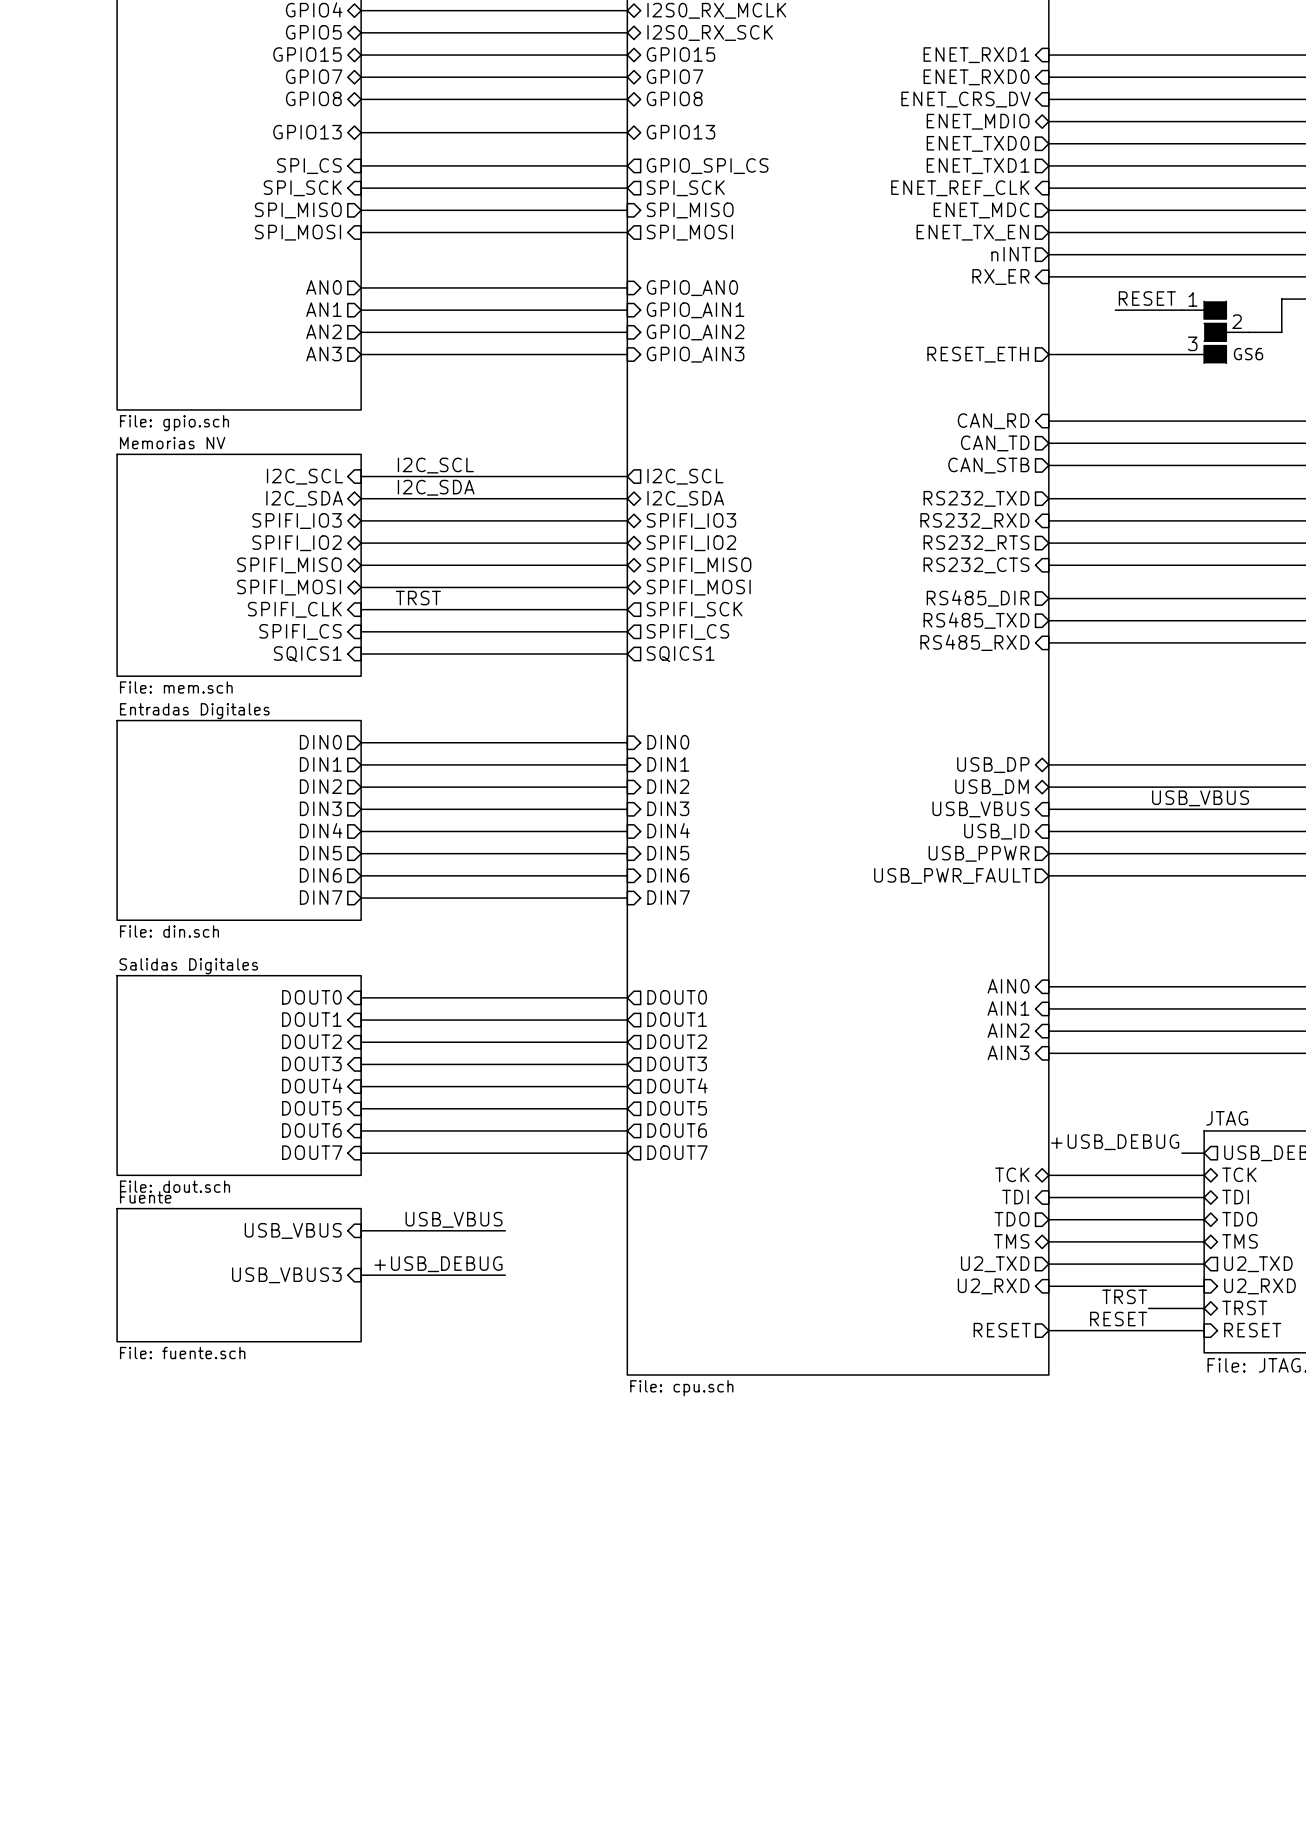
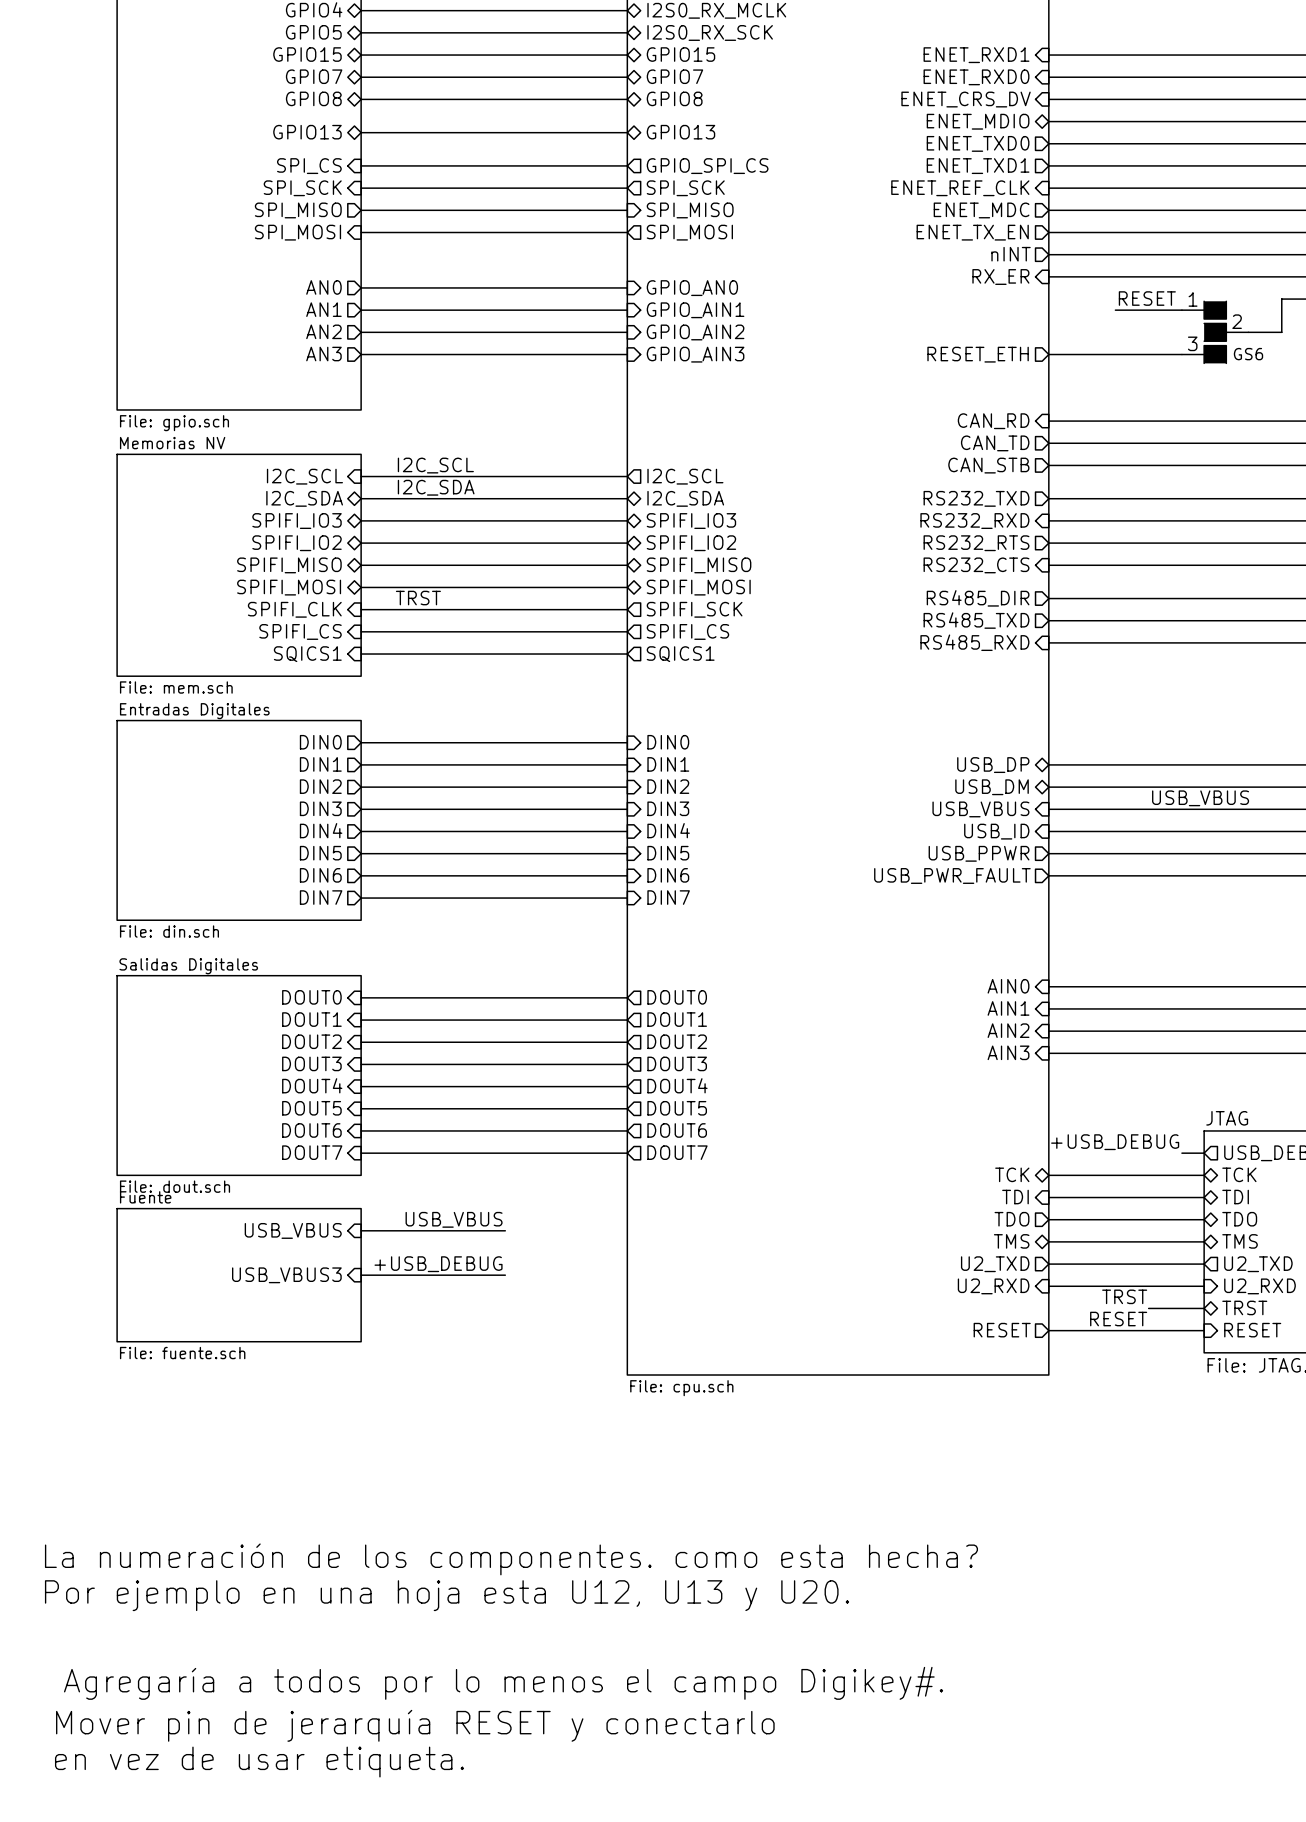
text: none -> La numeración de los componentes. como esta hecha? (511, 1559)
text: none -> Por ejemplo en una hoja esta U12, U13 y U20. (447, 1595)
text: none -> Agregaría a todos por lo menos el campo Digikey#. (503, 1683)
text: none -> Mover pin de jerarquía RESET y conectarlo (415, 1725)
text: none -> en vez de usar etiqueta. (259, 1762)

